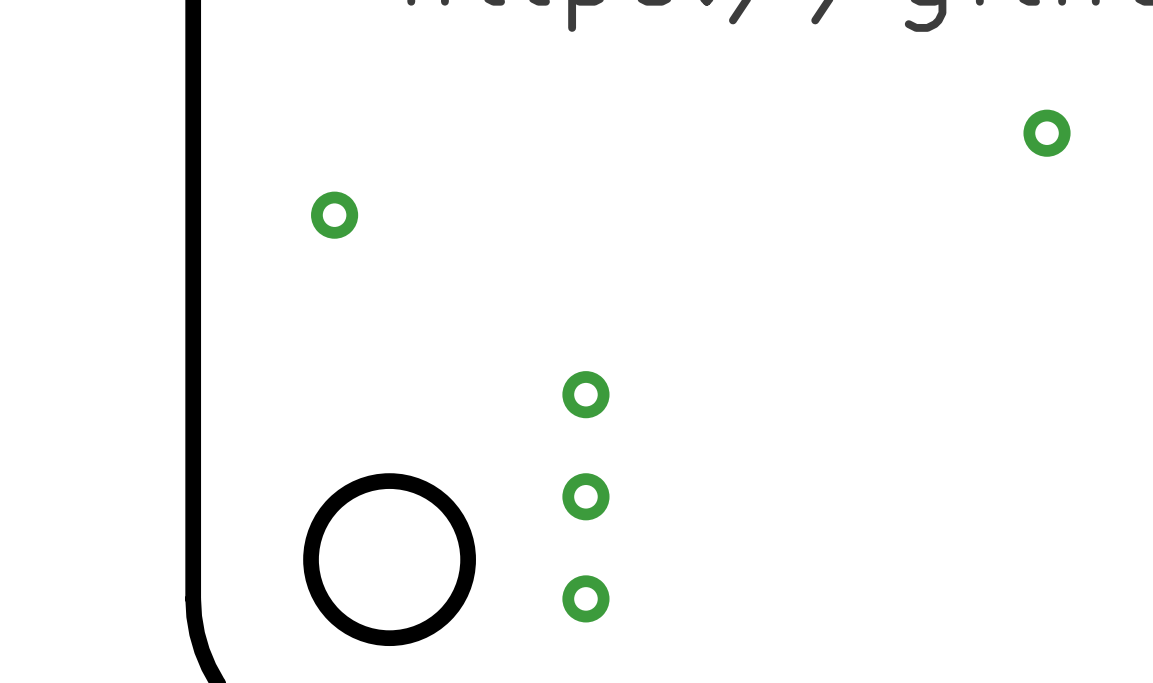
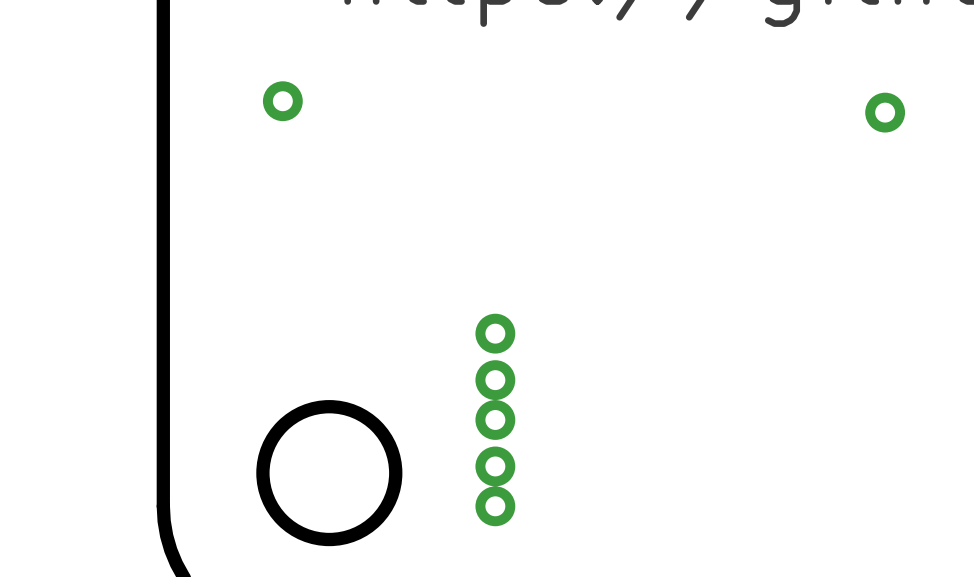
via position: (334, 215) -> (282, 101)
via: none -> (495, 380)
via: none -> (495, 466)

